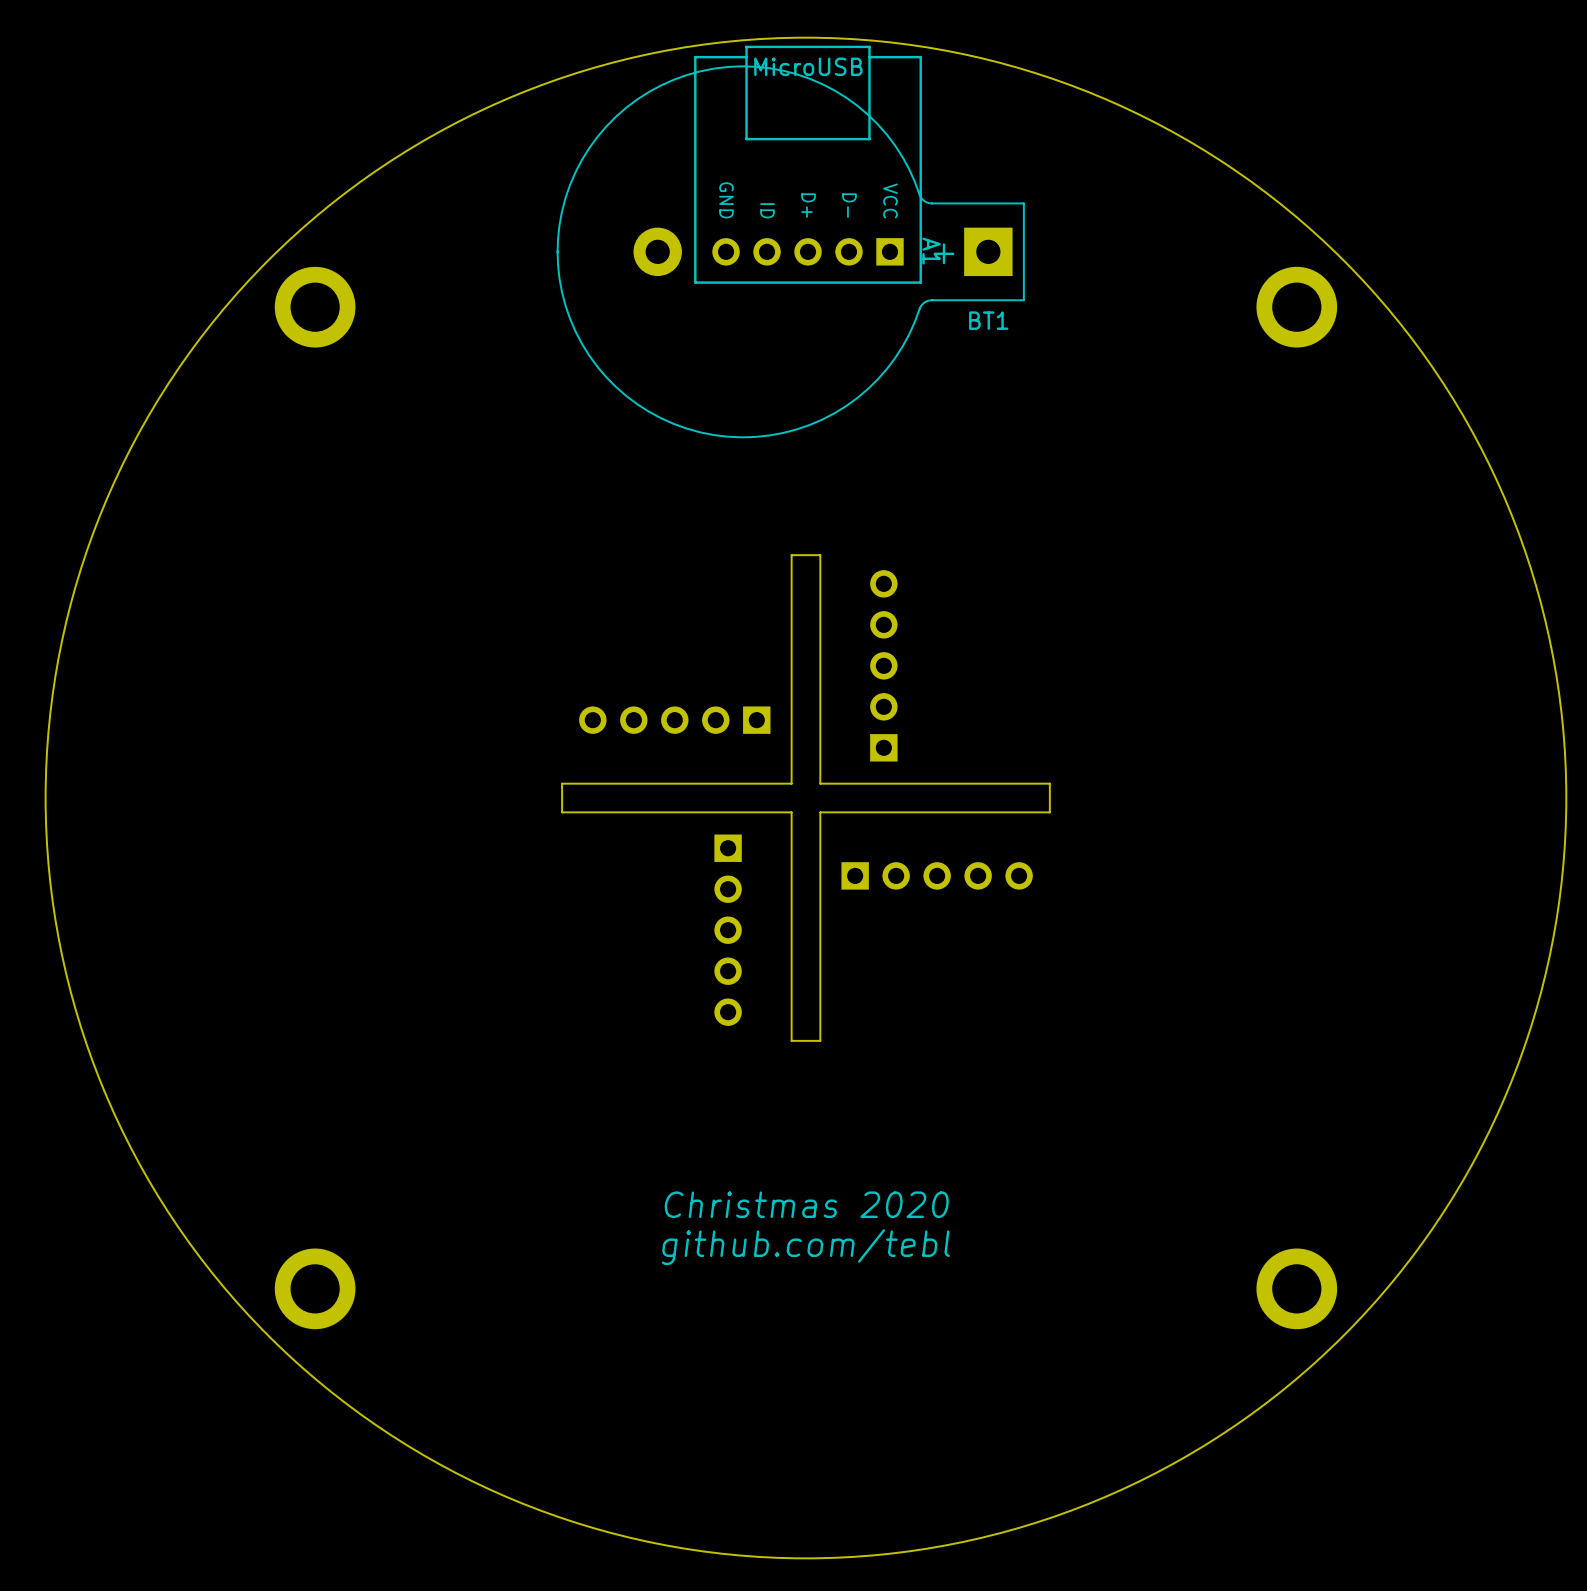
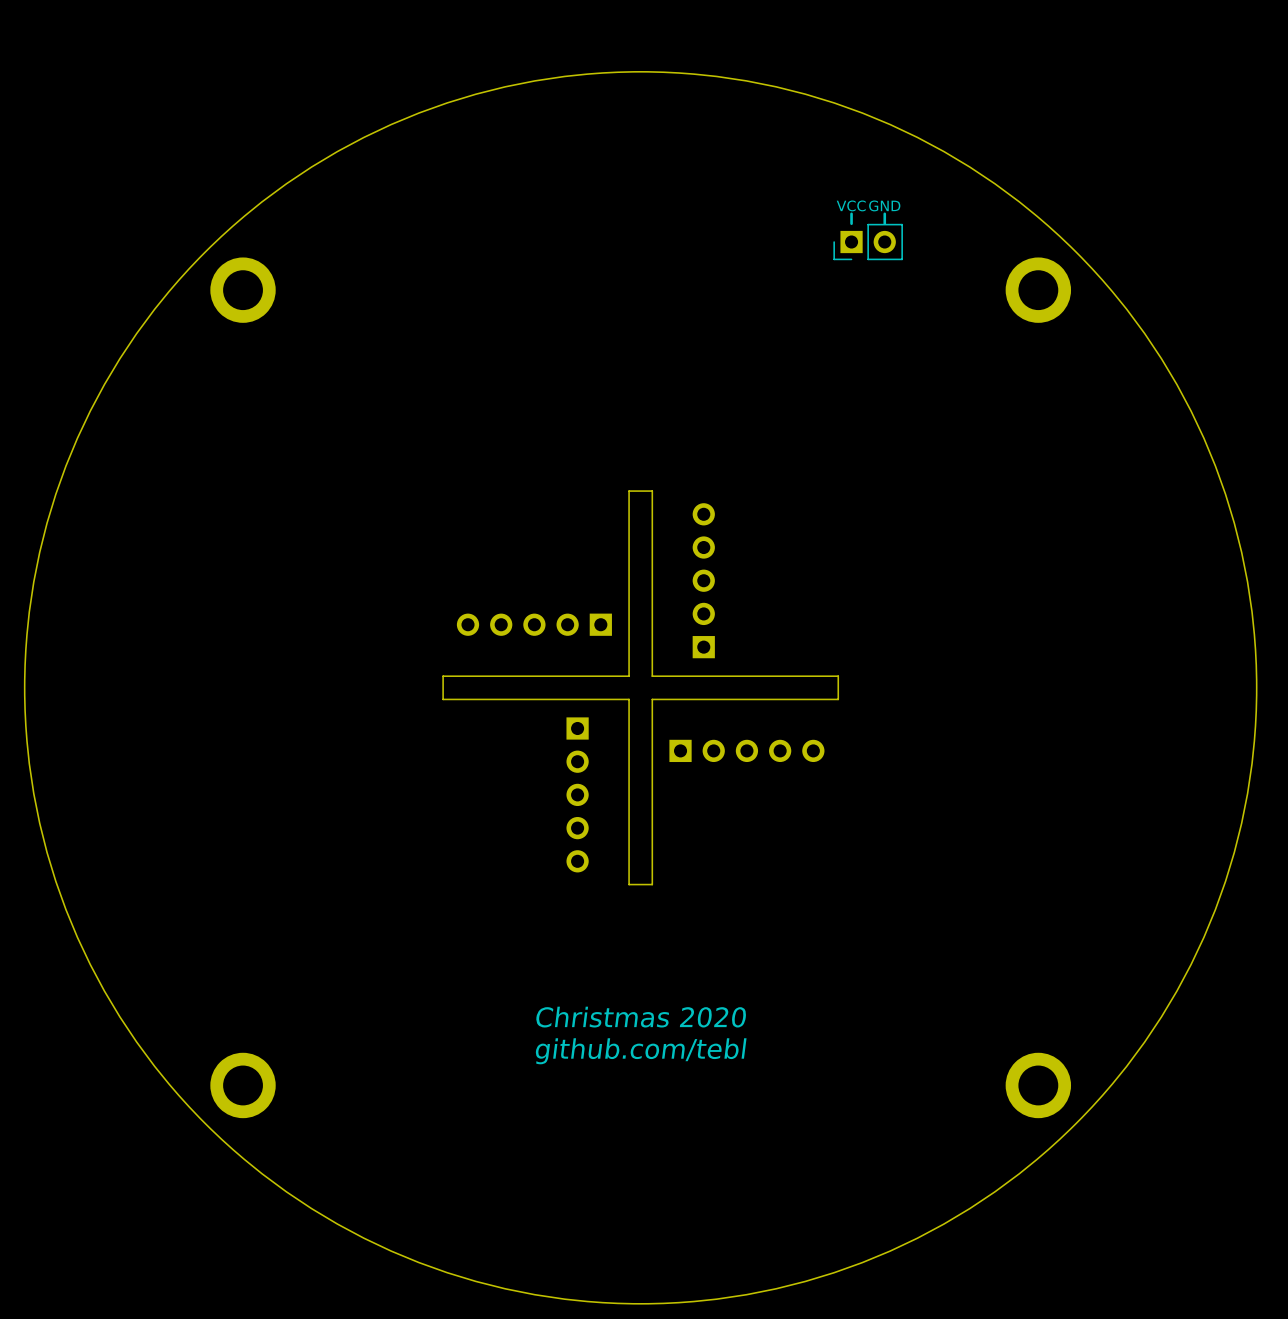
A1: MicroUSB (808, 164) -> none
text: none -> VCC (851, 205)
text: none -> GND (884, 205)
line: none -> (851, 213) (851, 223)
line: none -> (884, 213) (884, 223)
part: none -> (868, 242)
BT1: (790, 251) -> none

